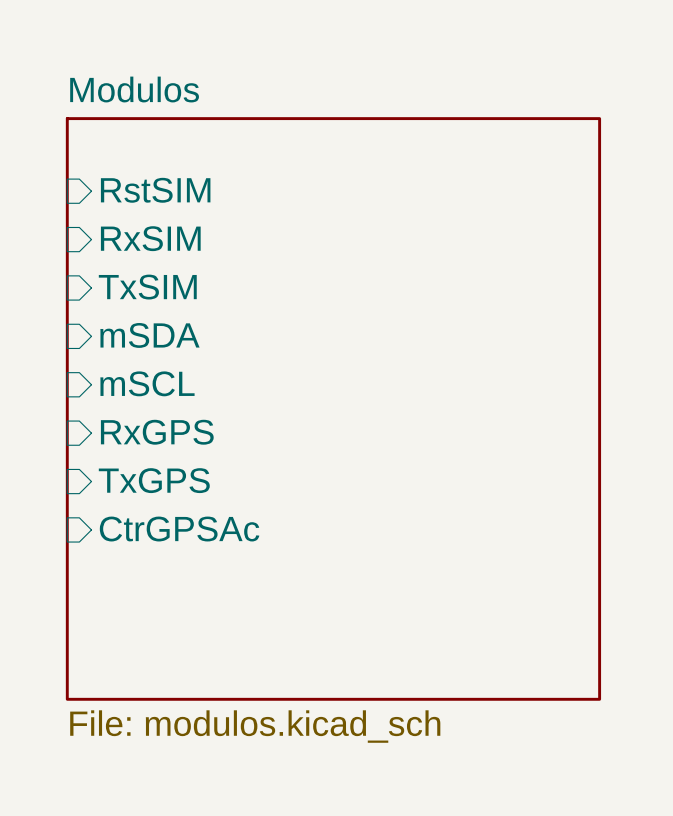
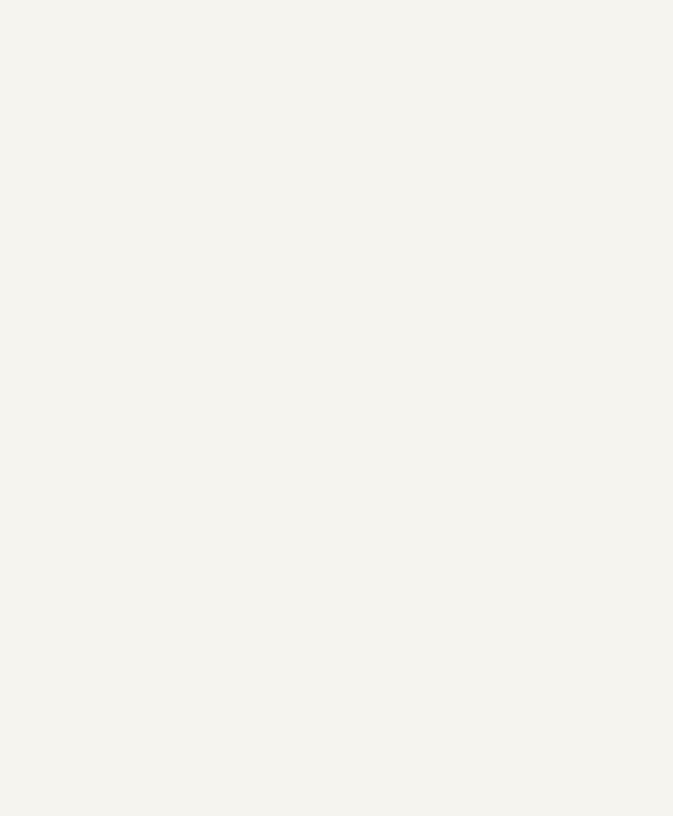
sheet pin: RstSIM (155, 190) -> none
sheet pin: RxSIM (150, 238) -> none
sheet pin: TxSIM (147, 287) -> none
sheet pin: mSDA (149, 335) -> none
sheet pin: mSCL (147, 383) -> none
sheet Modulos: File: modulos.kicad_sch (333, 408) -> none
sheet pin: RxGPS (157, 432) -> none
sheet pin: TxGPS (154, 480) -> none
sheet pin: CtrGPSAc (179, 529) -> none

